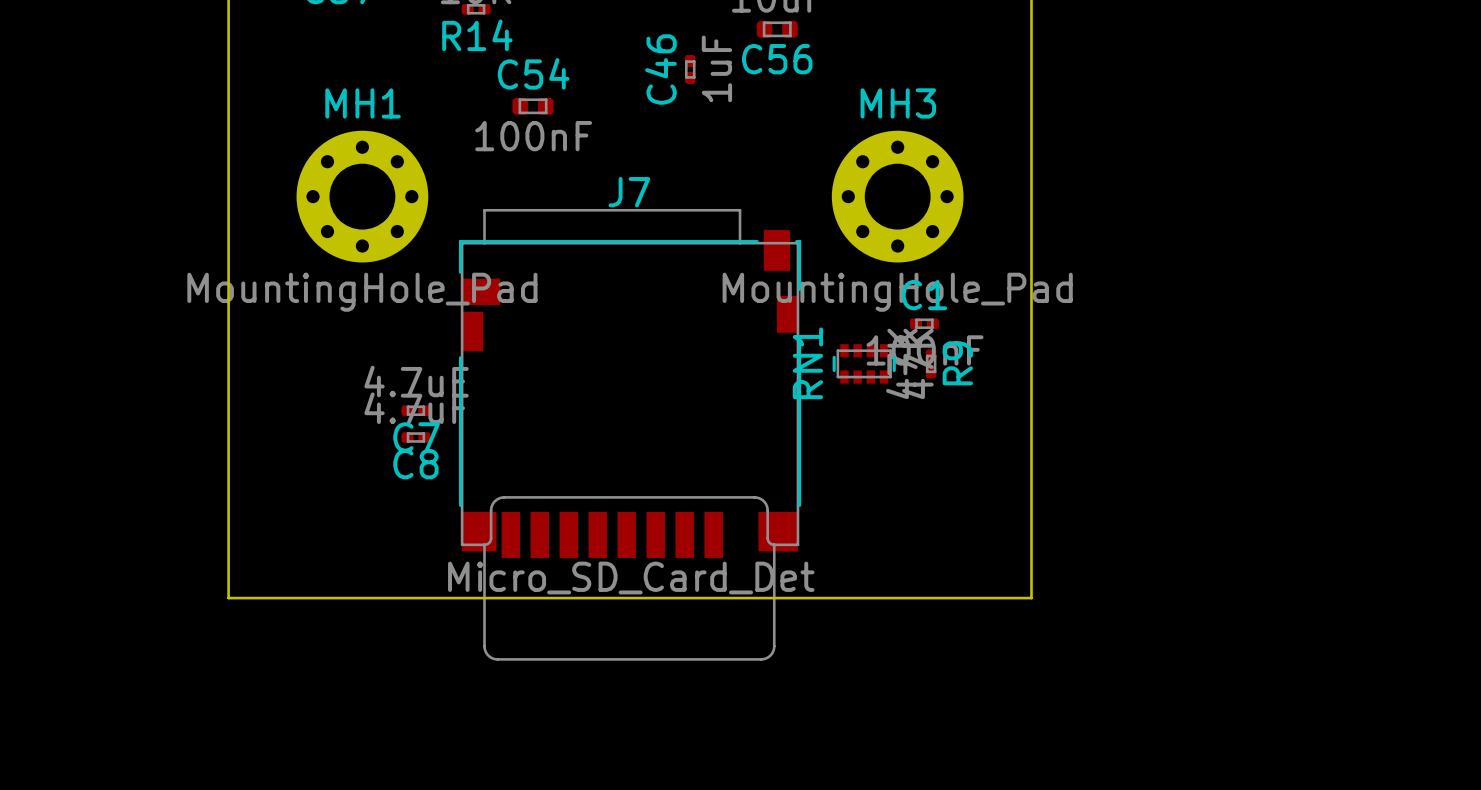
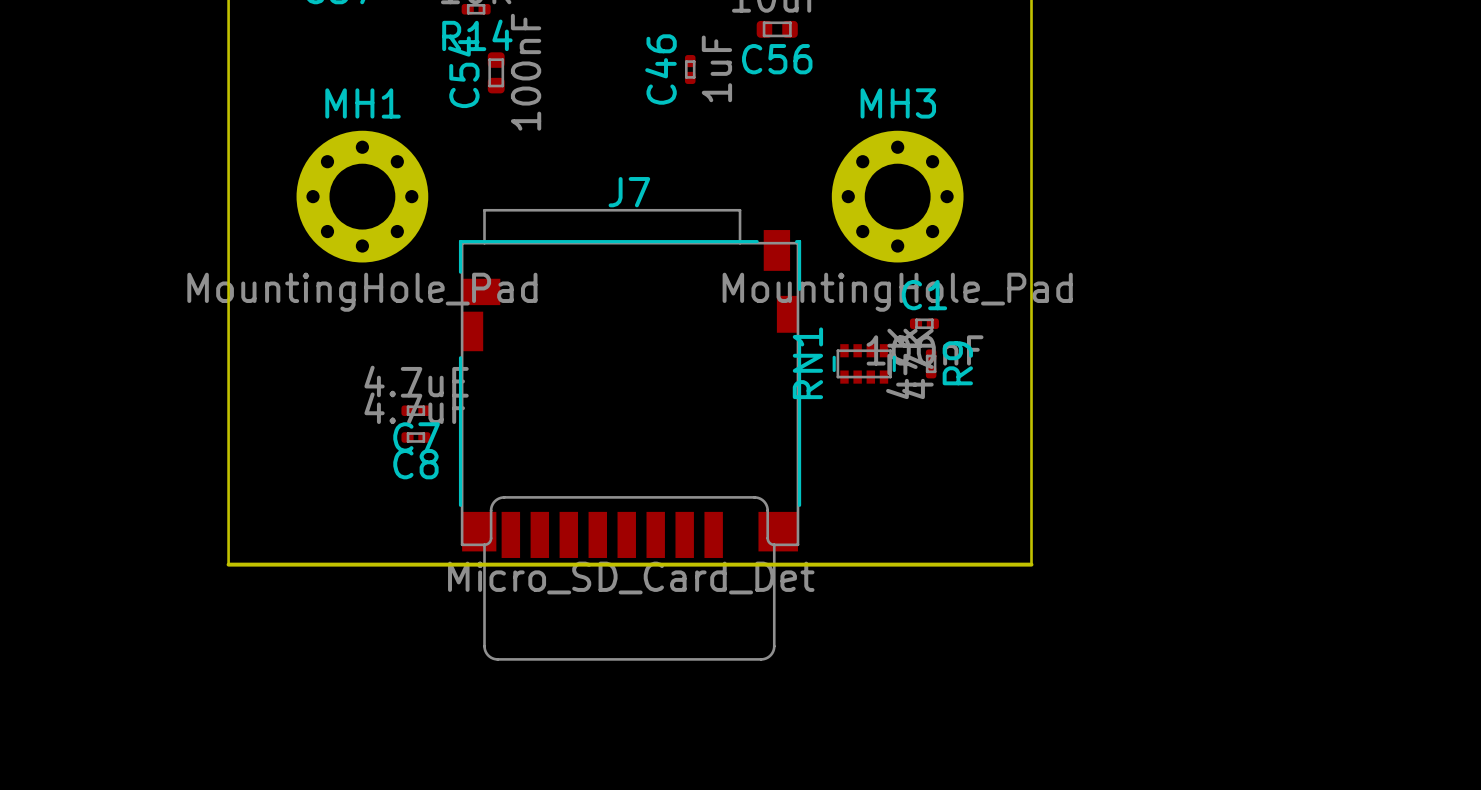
C54 rotation: 0° (533, 106) -> 90° clockwise (496, 72)
C54 position: (533, 106) -> (496, 72)
board edge: (228, 564) (228, 598) (1031, 598) (1031, 564) -> (228, 564) (1031, 564)

